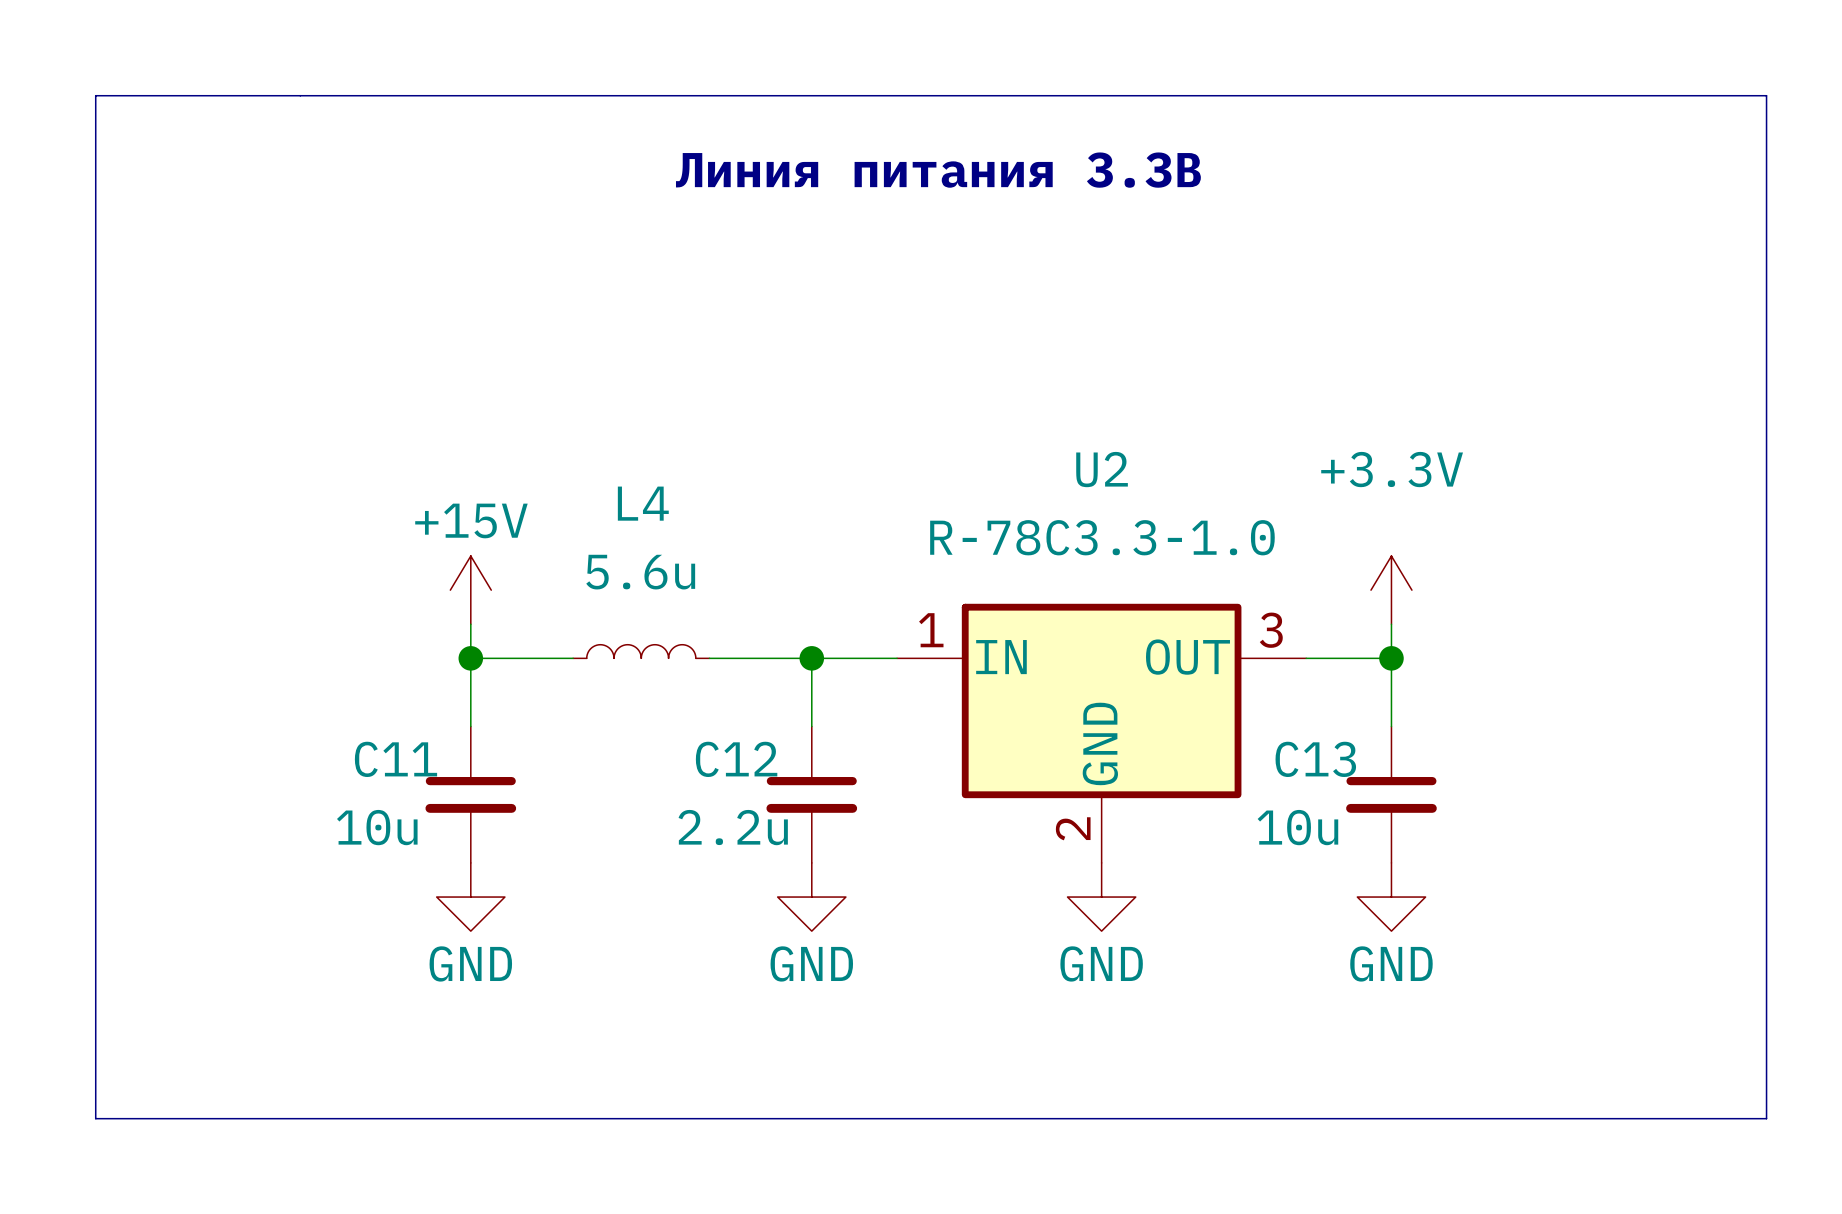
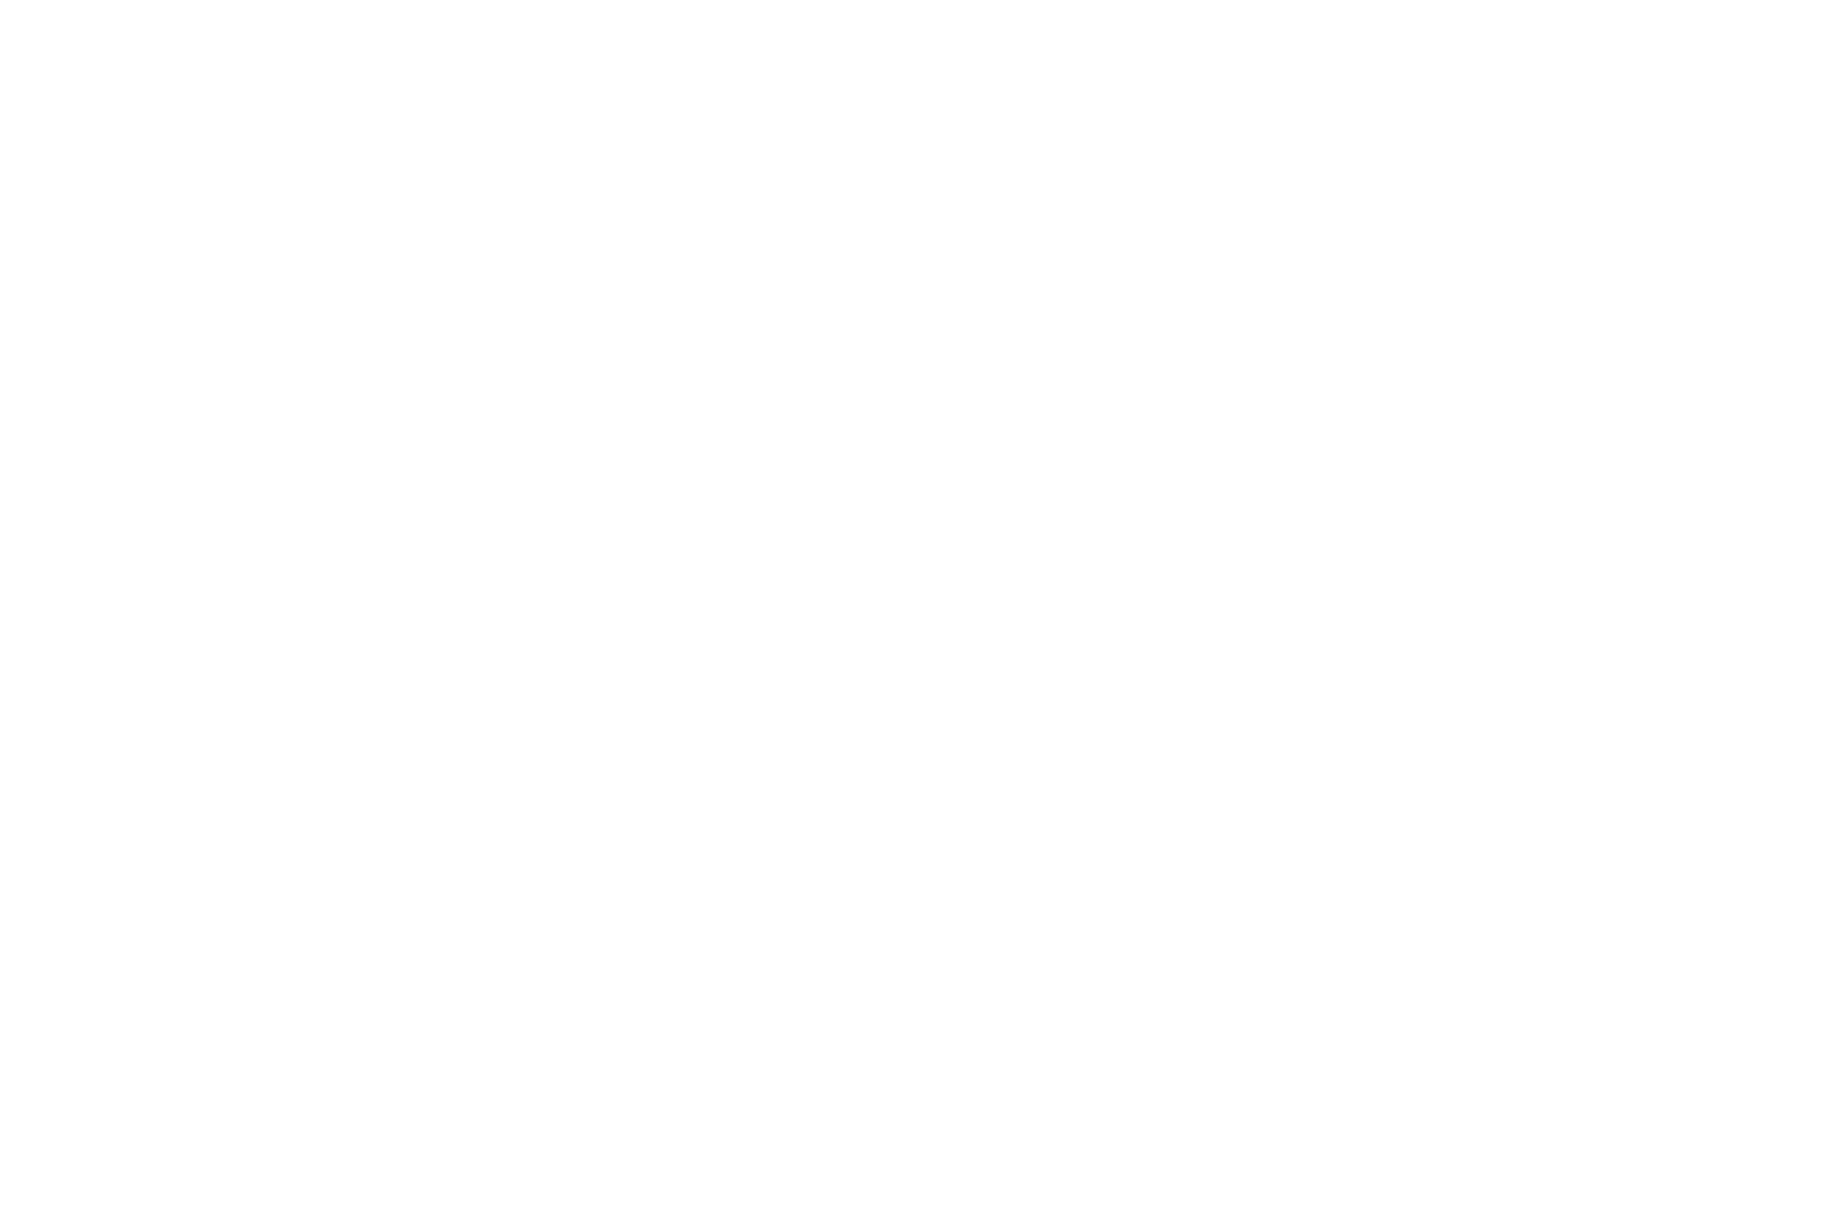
line: (95, 95) (1766, 95) (1766, 1118) (95, 1118) (95, 95) -> none
text: Линия питания 3.3В (938, 170) -> none
power symbol: +15V (470, 590) -> none
power symbol: +3.3V (1391, 590) -> none
wire: (470, 624) (470, 726) -> none
wire: (1391, 624) (1391, 726) -> none
L4: 5.6u (641, 651) -> none
wire: (470, 658) (573, 658) -> none
junction: (470, 658) -> none
wire: (709, 658) (897, 658) -> none
wire: (811, 658) (811, 726) -> none
junction: (811, 658) -> none
wire: (1306, 658) (1391, 658) -> none
junction: (1391, 658) -> none
U2: R-78C3.3-1.0 (1101, 733) -> none
C11: 10u (470, 794) -> none
C12: 2.2u (811, 794) -> none
C13: 10u (1391, 794) -> none
power symbol: GND (470, 897) -> none
power symbol: GND (811, 897) -> none
power symbol: GND (1101, 897) -> none
power symbol: GND (1391, 897) -> none

